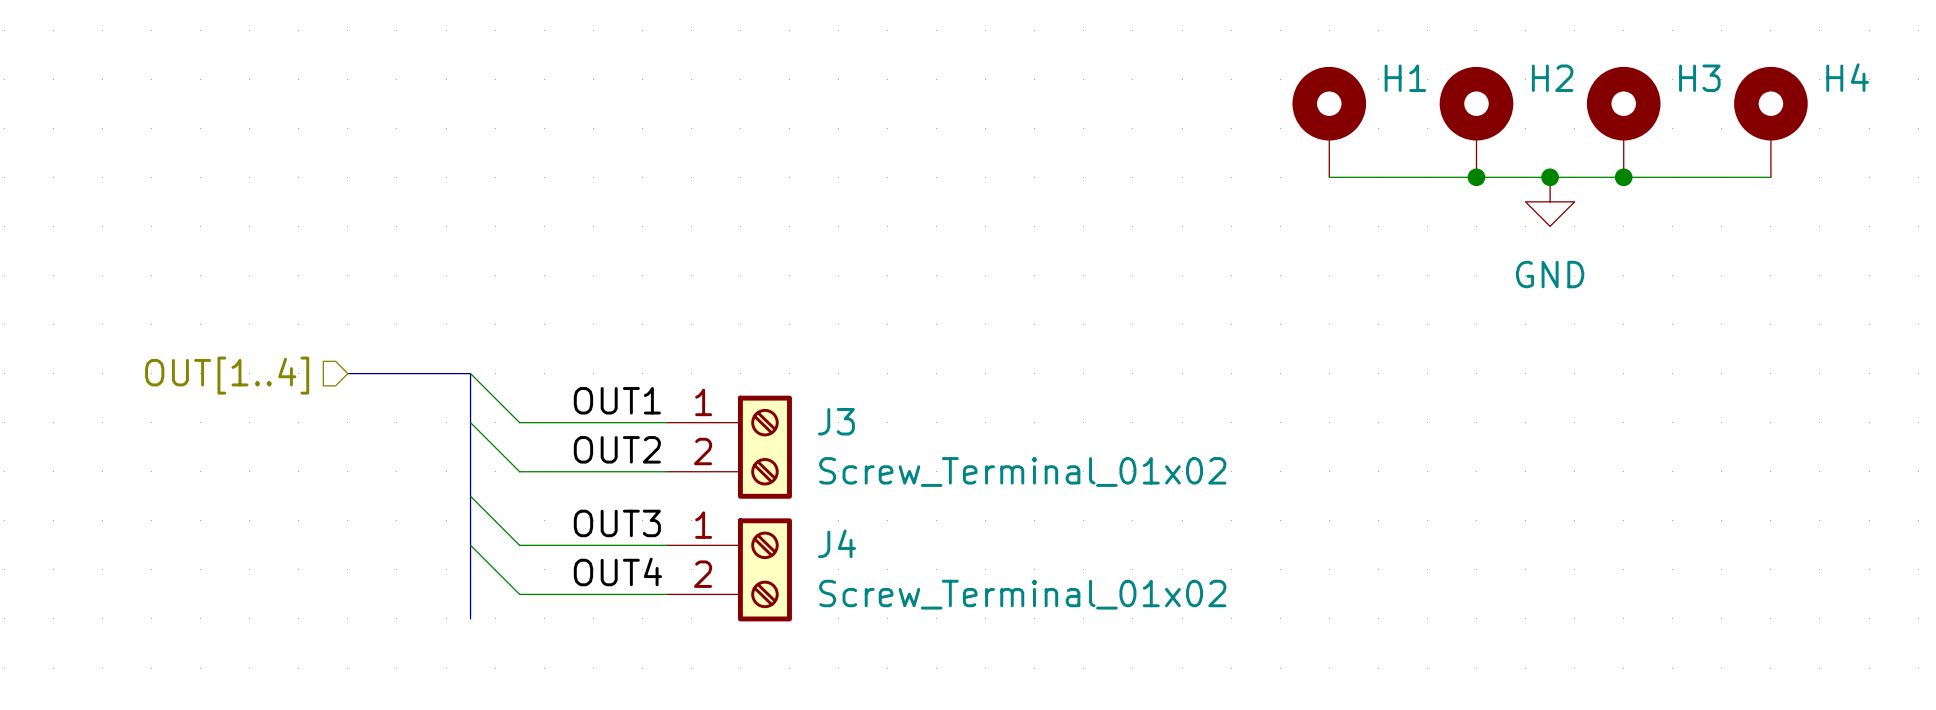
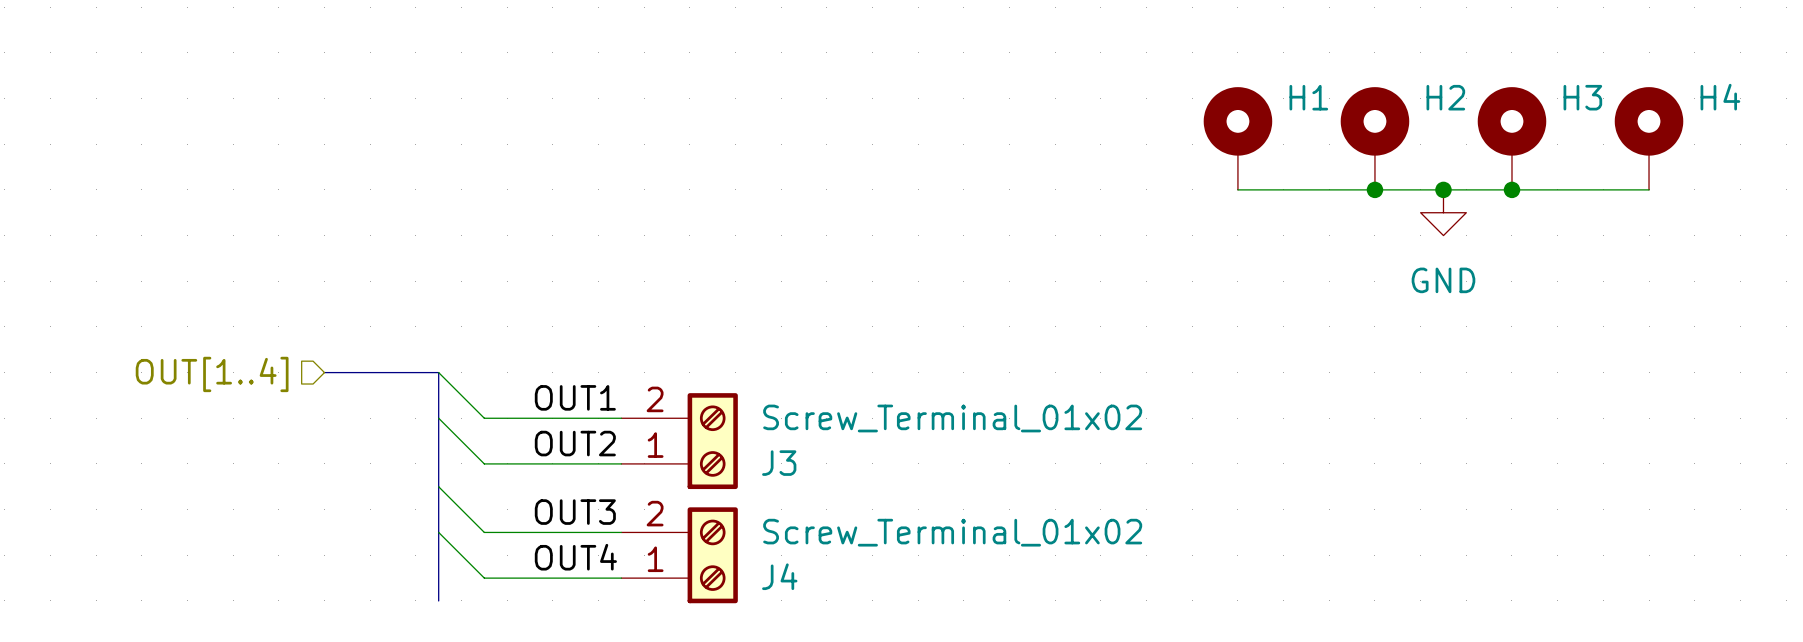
J3 flip: as is (764, 447) -> up-down (712, 441)
J4 flip: as is (764, 569) -> up-down (712, 555)

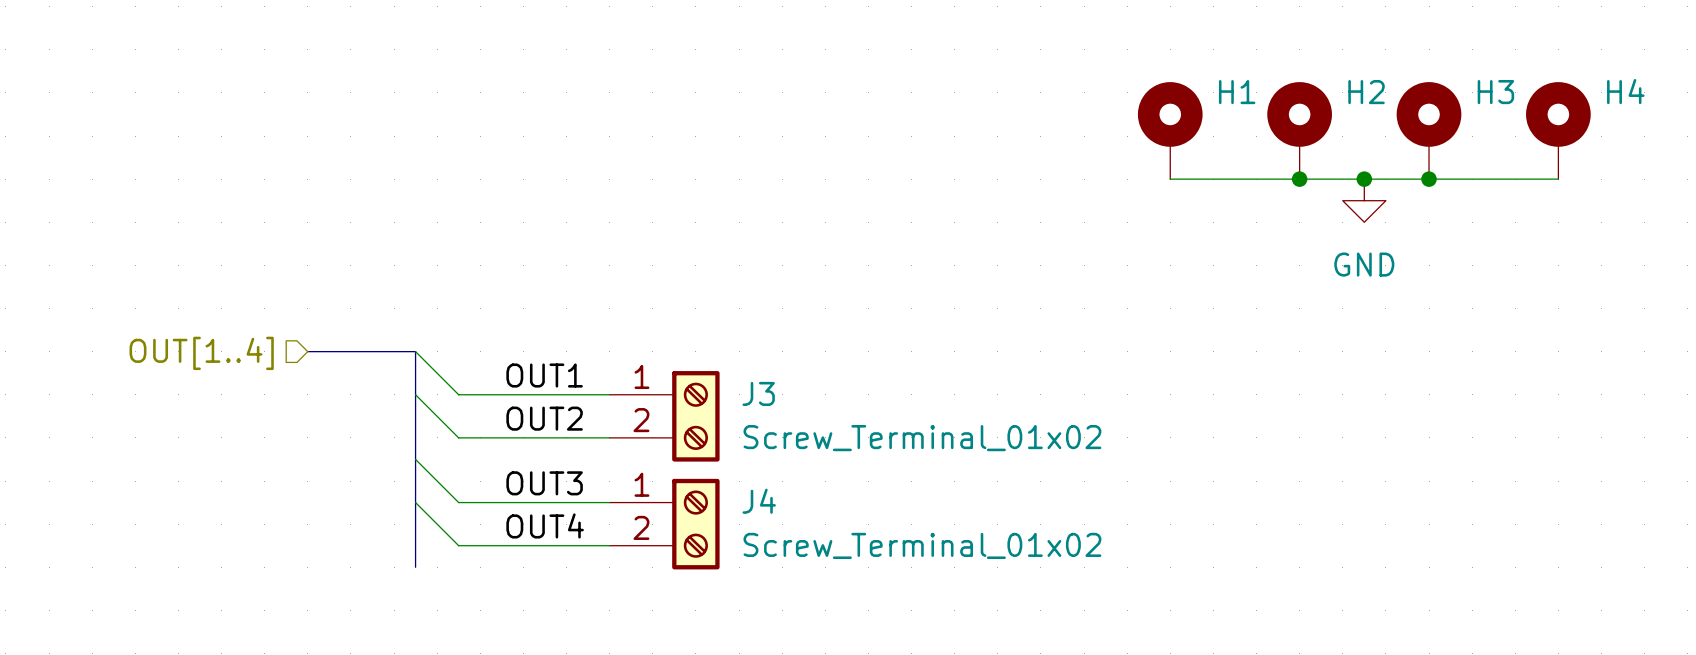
J3 flip: as is (712, 441) -> up-down (695, 416)
J4 flip: as is (712, 555) -> up-down (695, 524)

